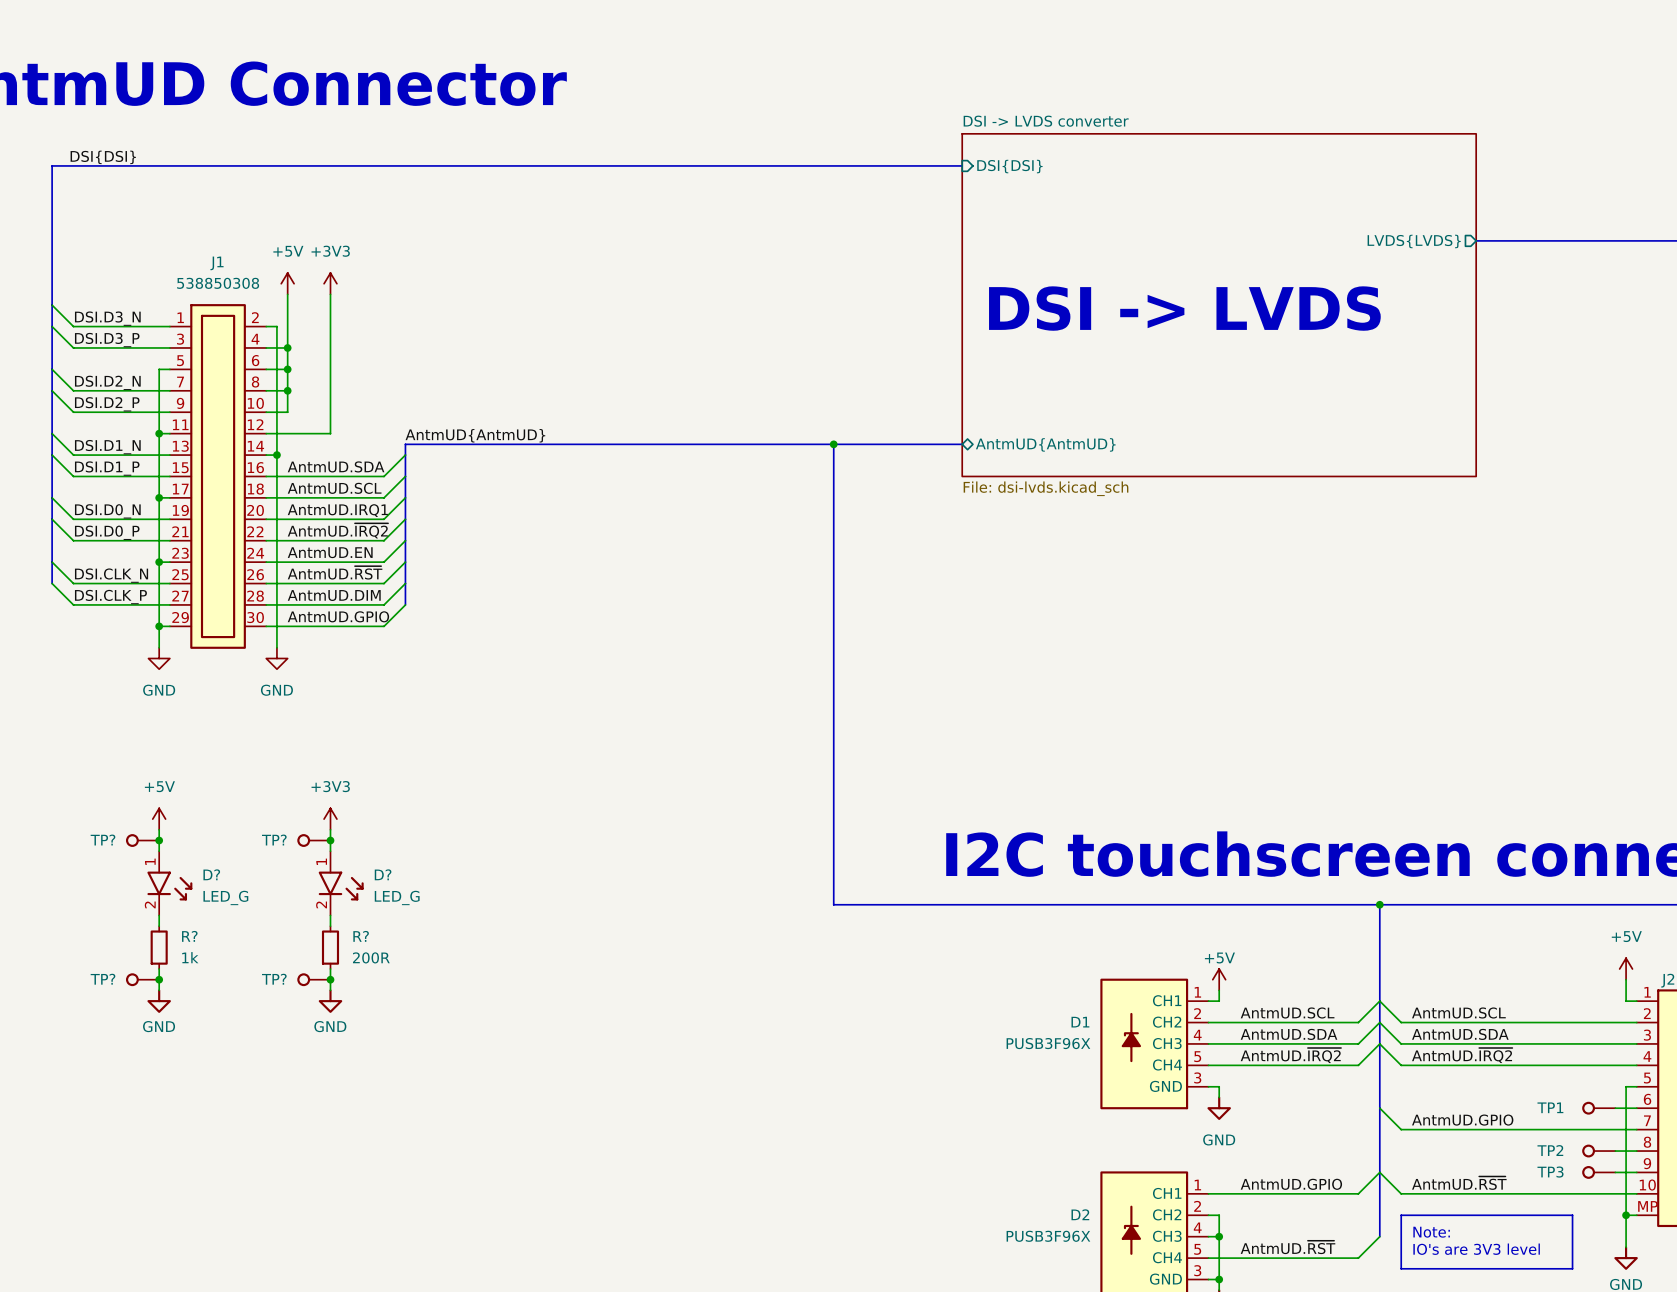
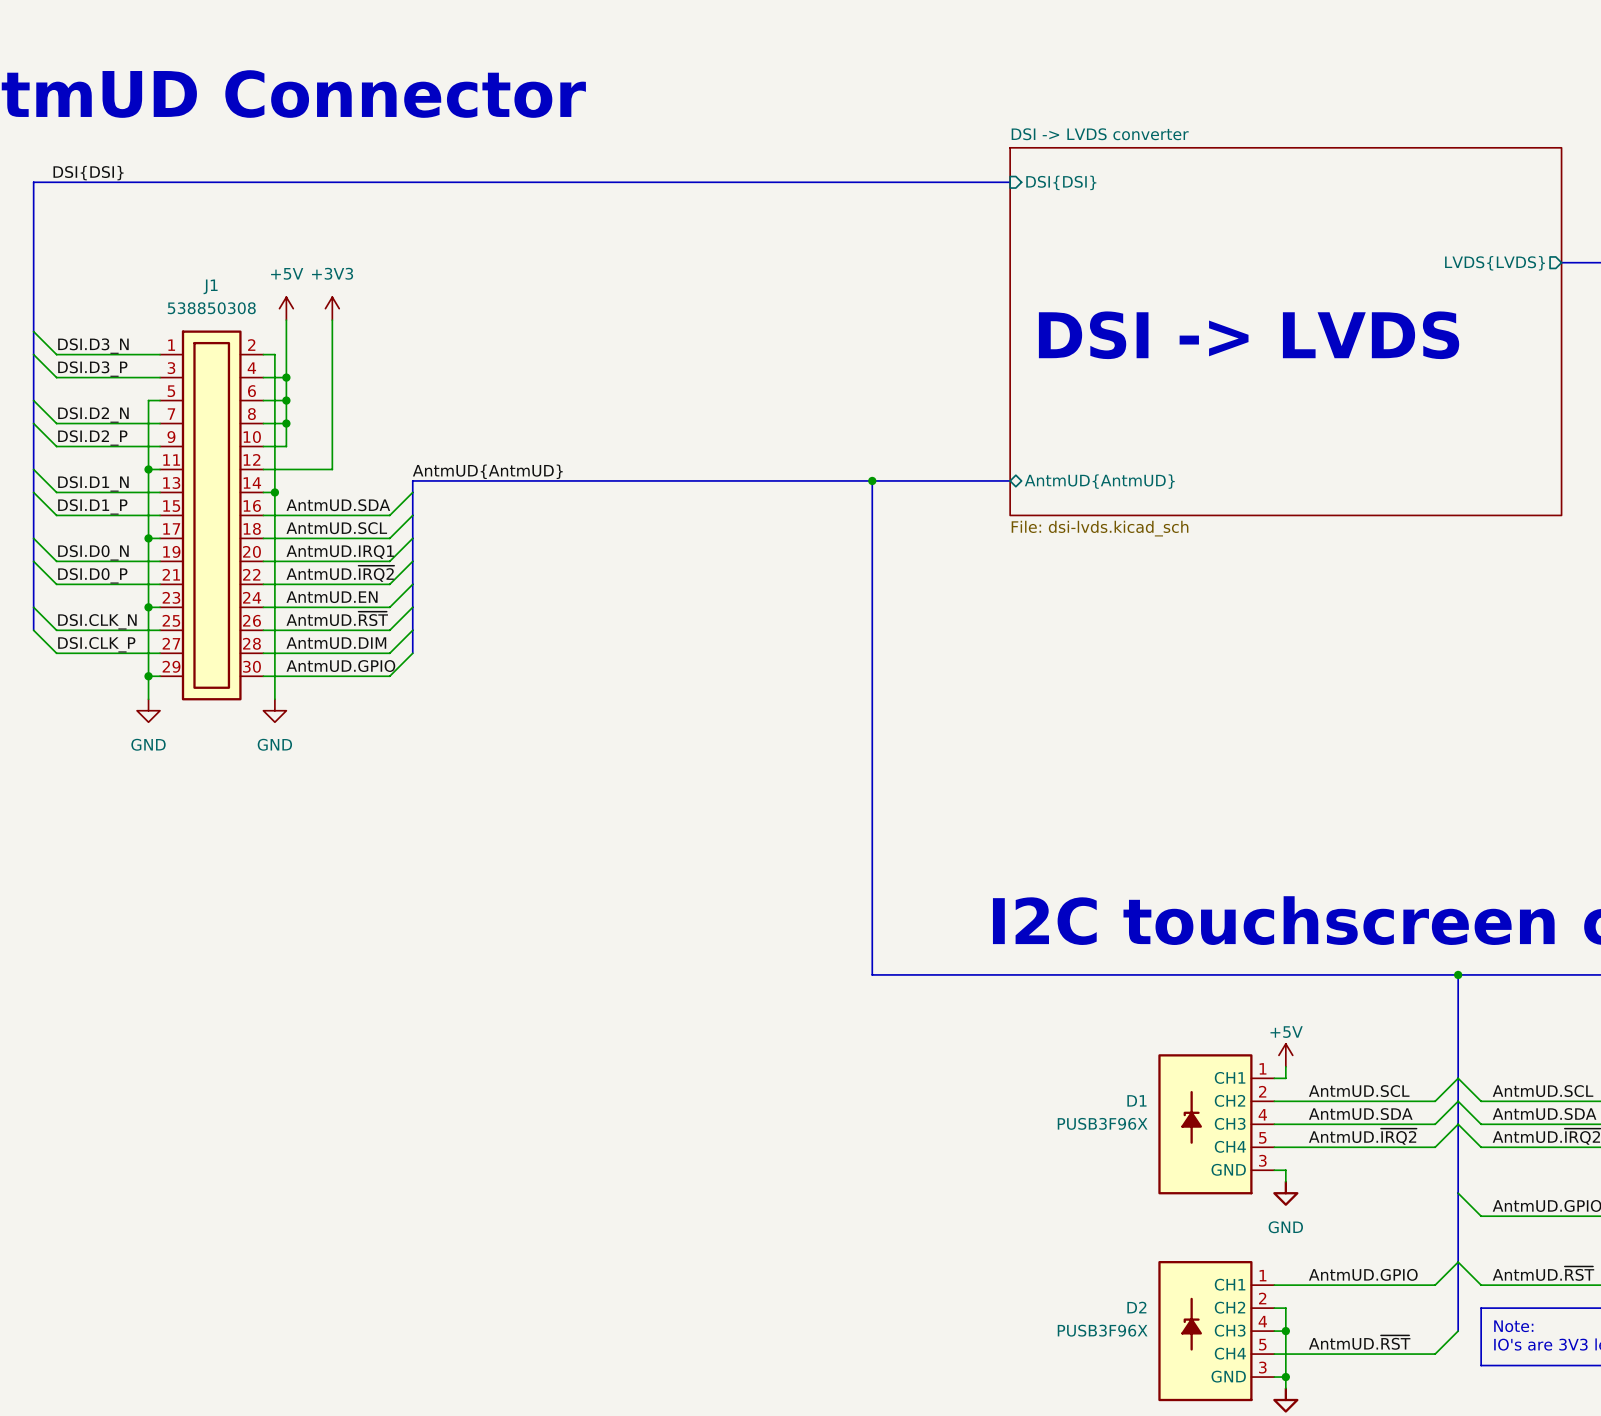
power symbol: +5V (159, 819) -> none
power symbol: +3V3 (330, 819) -> none
wire: (159, 829) (159, 851) -> none
wire: (330, 829) (330, 851) -> none
TP?: (142, 840) -> none
junction: (159, 840) -> none
TP?: (313, 840) -> none
junction: (330, 840) -> none
D?: LED_G (169, 883) -> none
D?: LED_G (341, 883) -> none
wire: (159, 915) (159, 926) -> none
wire: (330, 915) (330, 926) -> none
R?: (159, 947) -> none
R?: (330, 947) -> none
wire: (159, 969) (159, 990) -> none
wire: (330, 969) (330, 990) -> none
TP?: (142, 979) -> none
junction: (159, 979) -> none
TP?: (313, 979) -> none
junction: (330, 979) -> none
power symbol: GND (159, 1001) -> none
power symbol: GND (330, 1001) -> none

